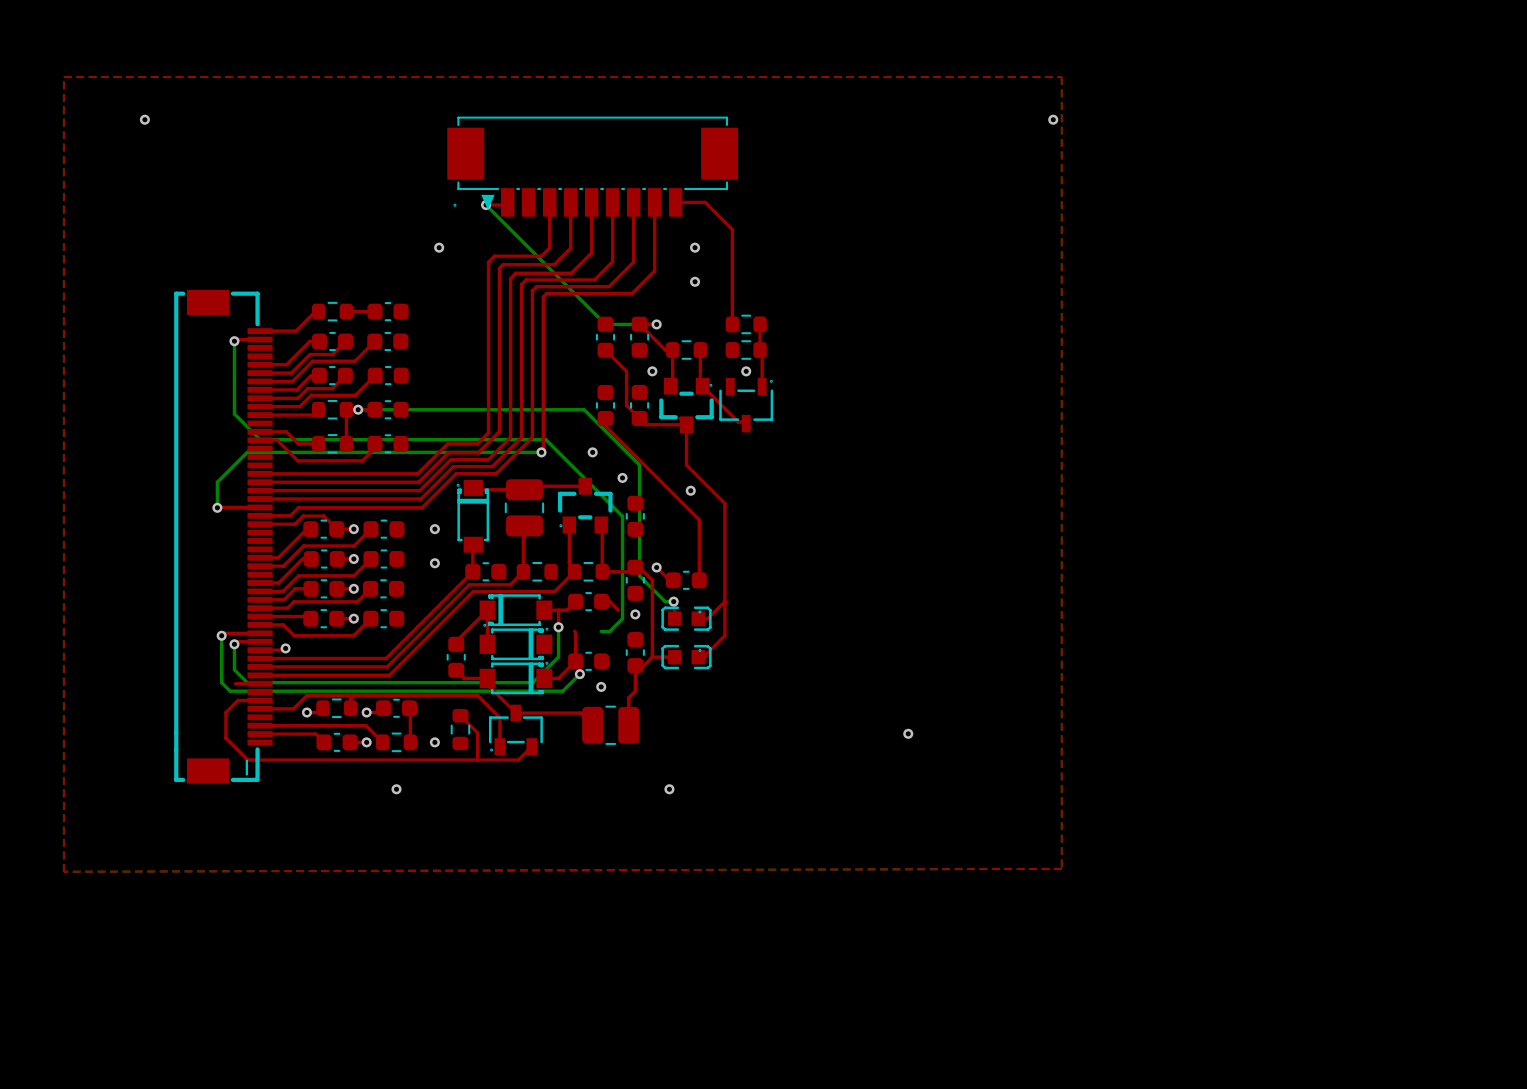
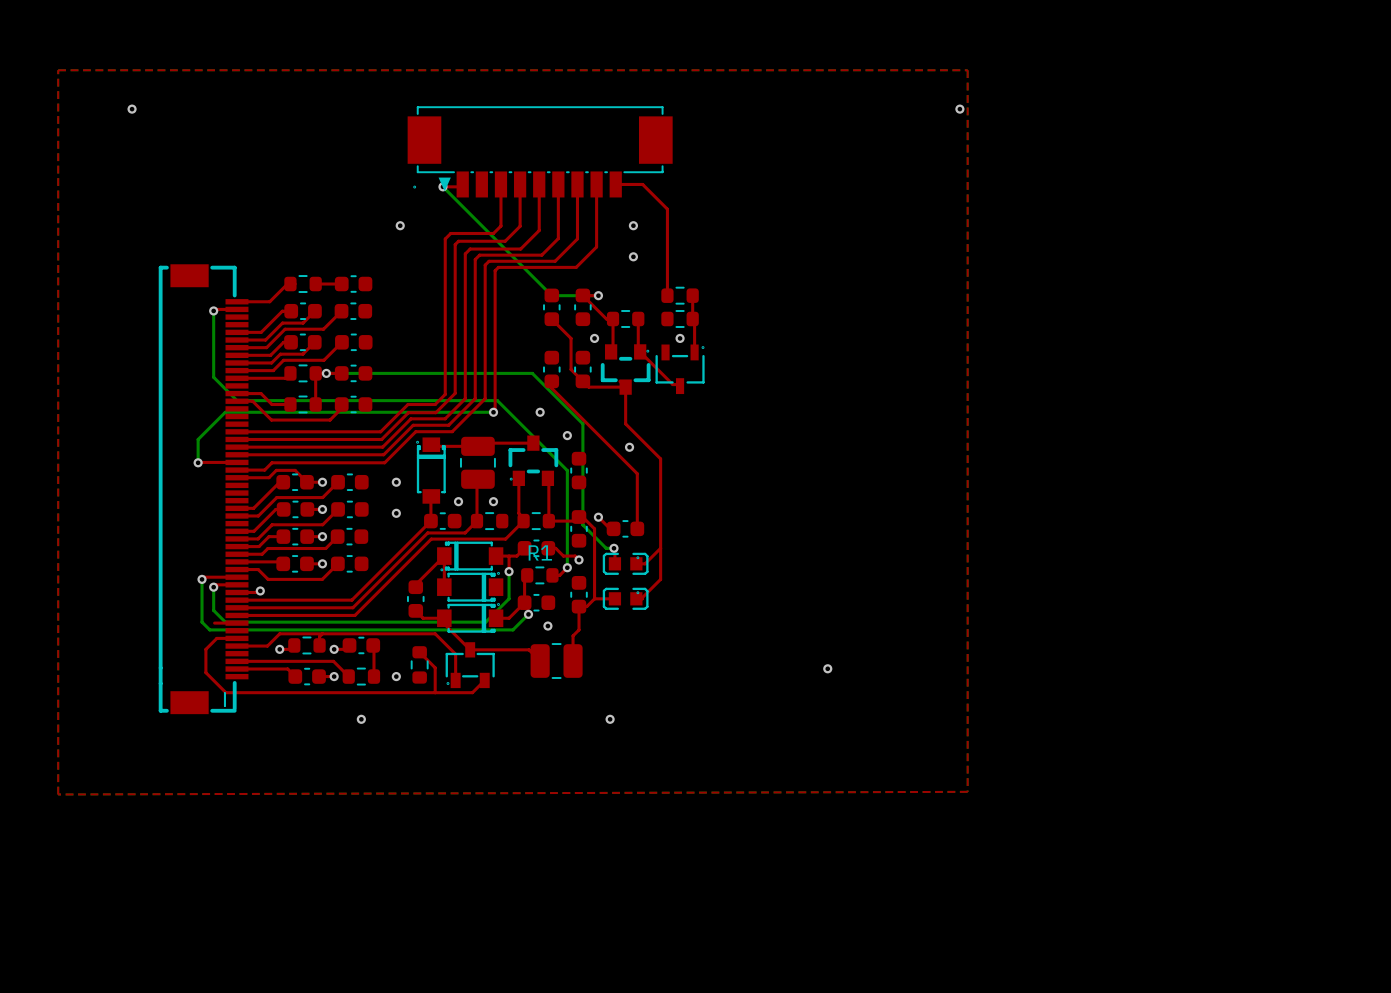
via: none -> (458, 501)
via: none -> (493, 501)
top track: none -> (563, 556) (575, 556) (579, 559)
bottom track: (622, 618) (609, 631) (601, 631) -> none
top track: none -> (567, 567) (559, 575) (552, 575)
via: none -> (567, 567)
R1: none -> (539, 575)

